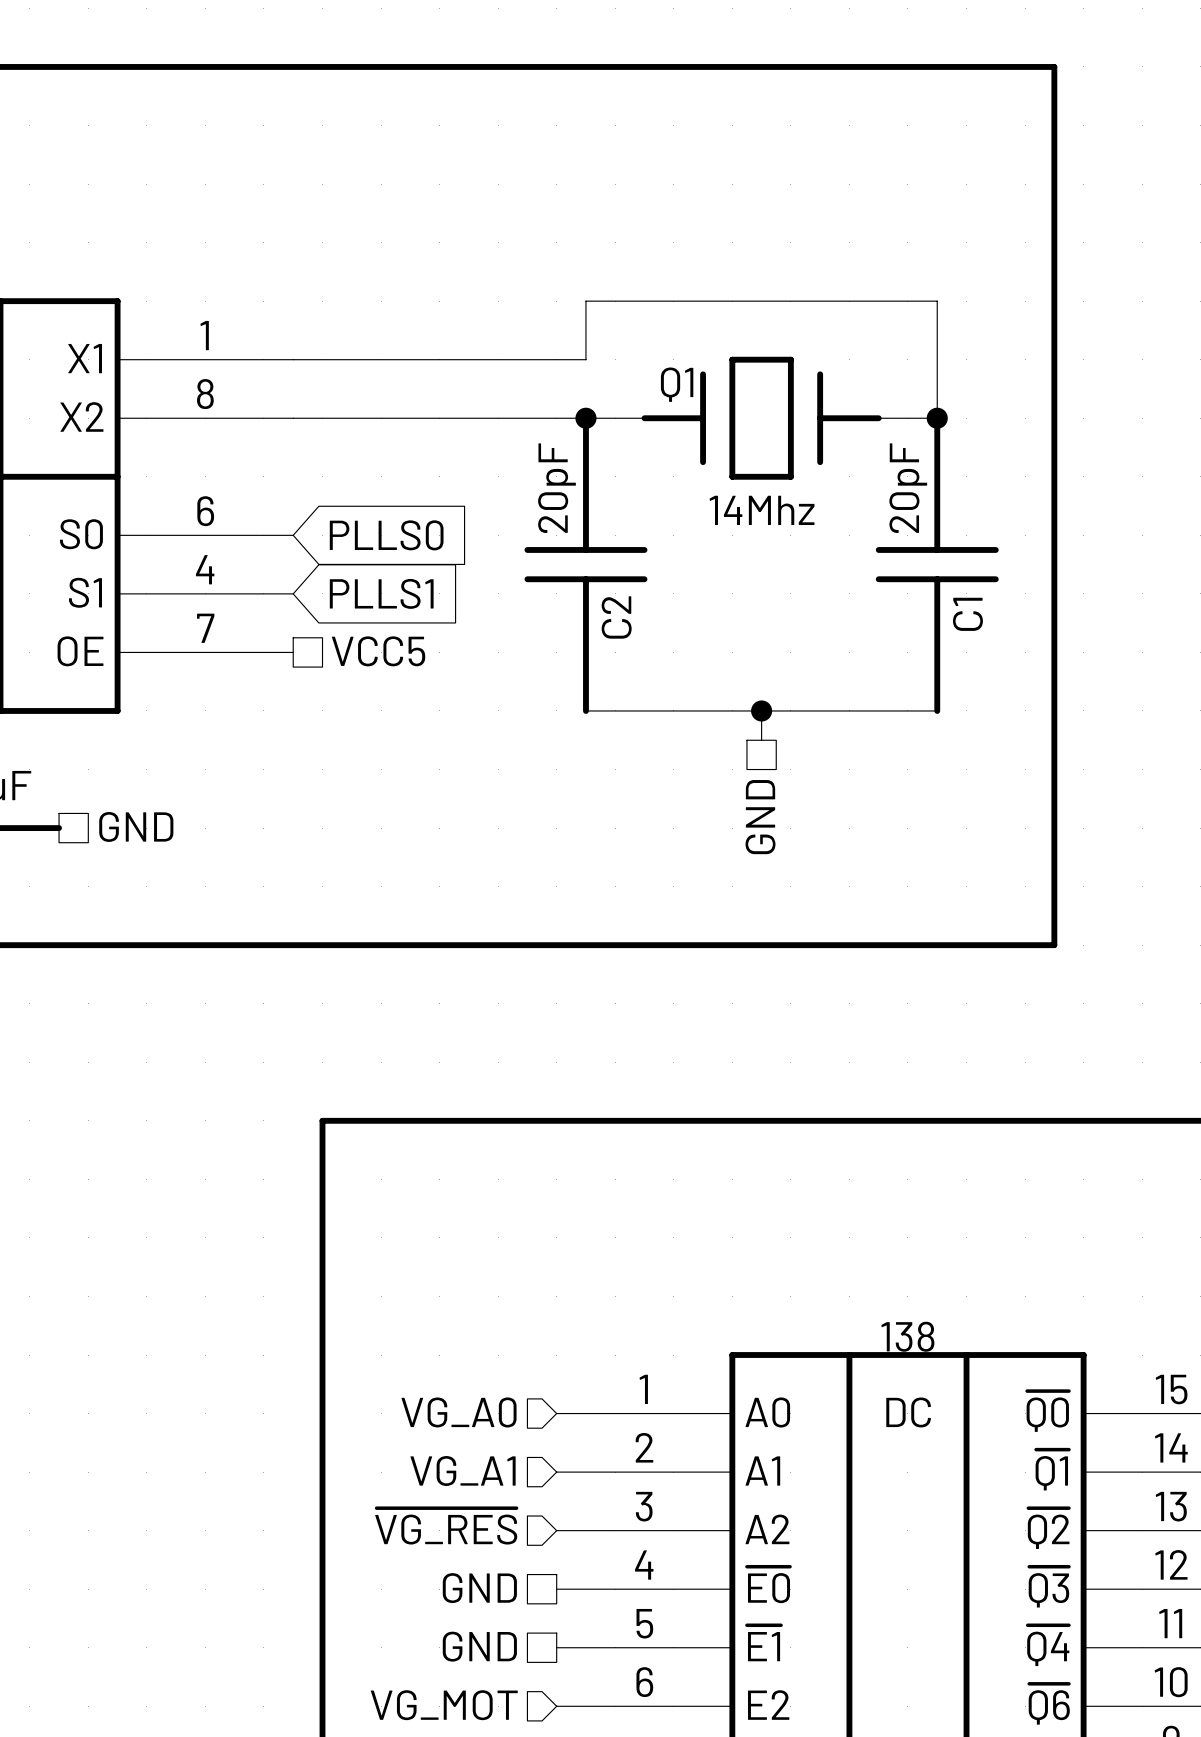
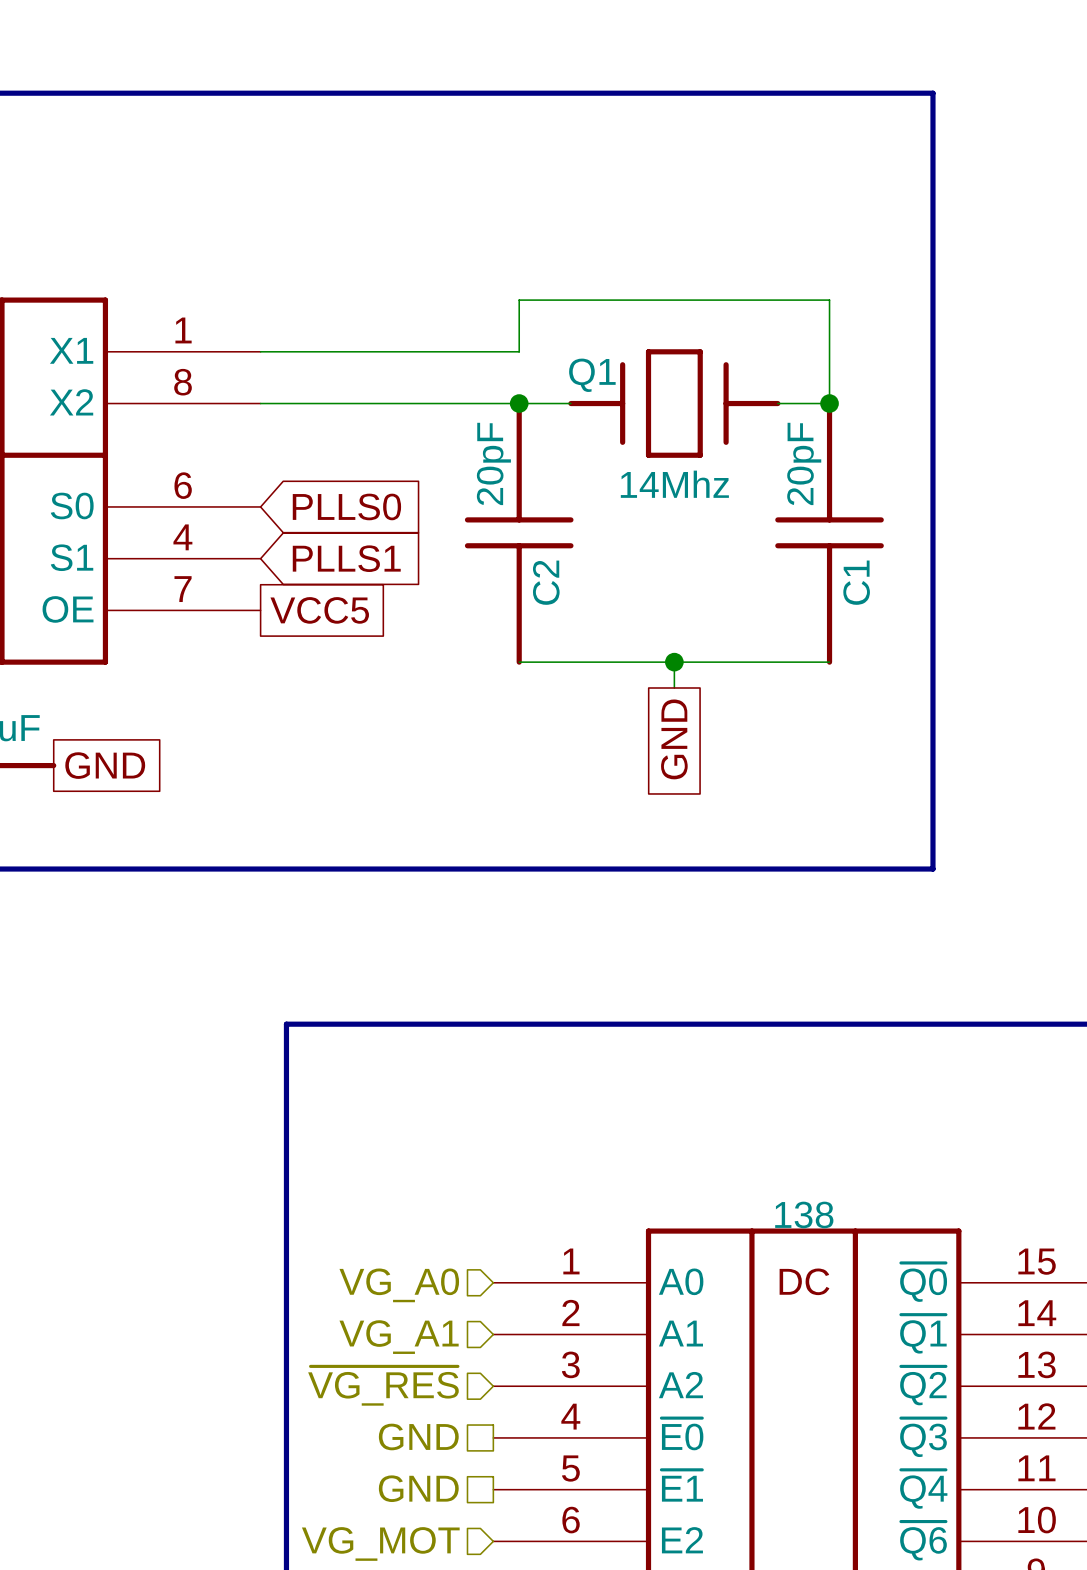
hierarchical label: VCC5 (378, 651) -> none
global label: none -> VCC5 (319, 610)
global label: none -> GND (674, 739)
hierarchical label: GND (760, 817) -> none
hierarchical label: GND (136, 826) -> none
global label: none -> GND (105, 765)

